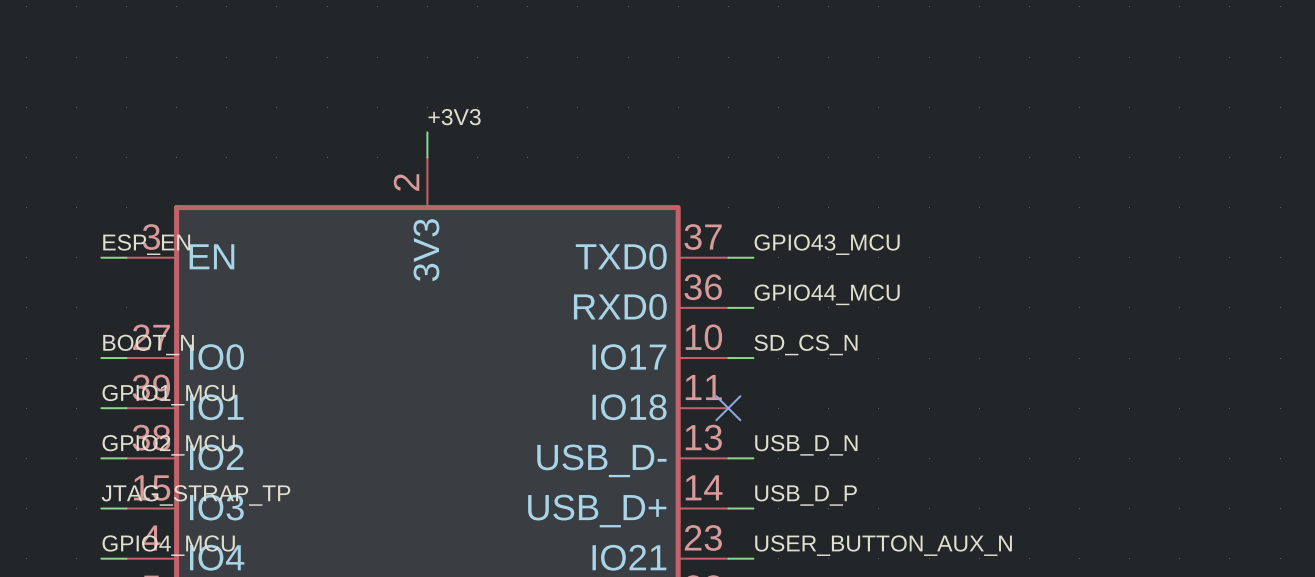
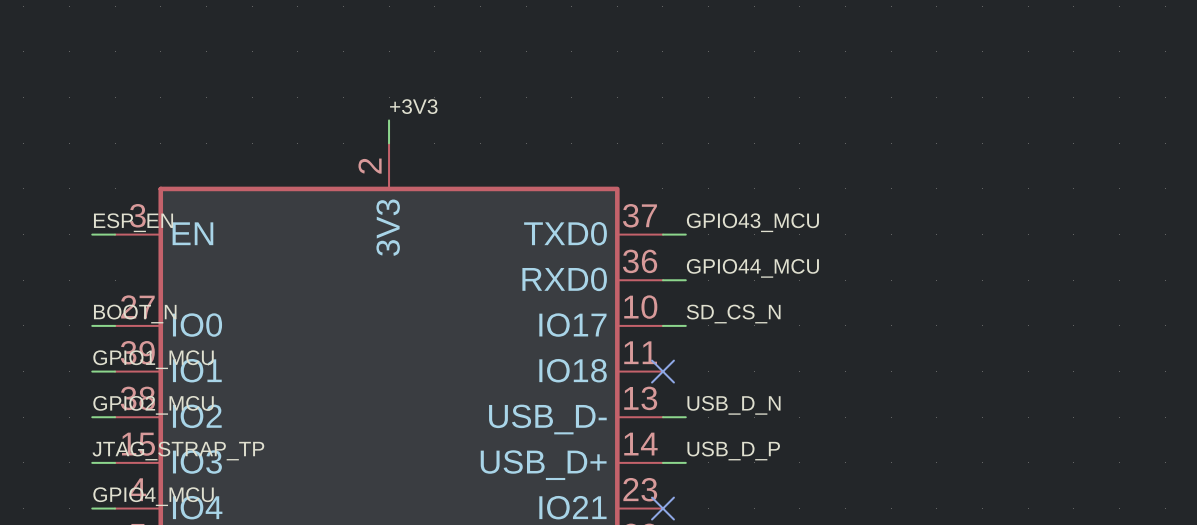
label: USER_BUTTON_AUX_N (883, 545) -> none
wire: (728, 558) (753, 558) -> none
no-connect mark: none -> (662, 508)

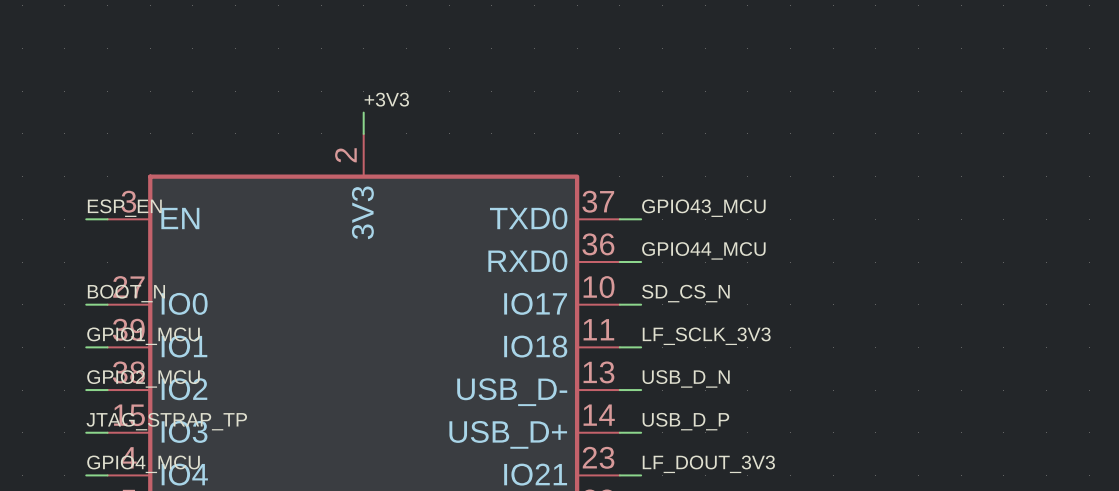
label: none -> LF_SCLK_3V3 (706, 336)
wire: none -> (619, 347) (641, 347)
no-connect mark: (662, 371) -> none
label: none -> LF_DOUT_3V3 (708, 464)
wire: none -> (619, 475) (641, 475)
no-connect mark: (662, 508) -> none

